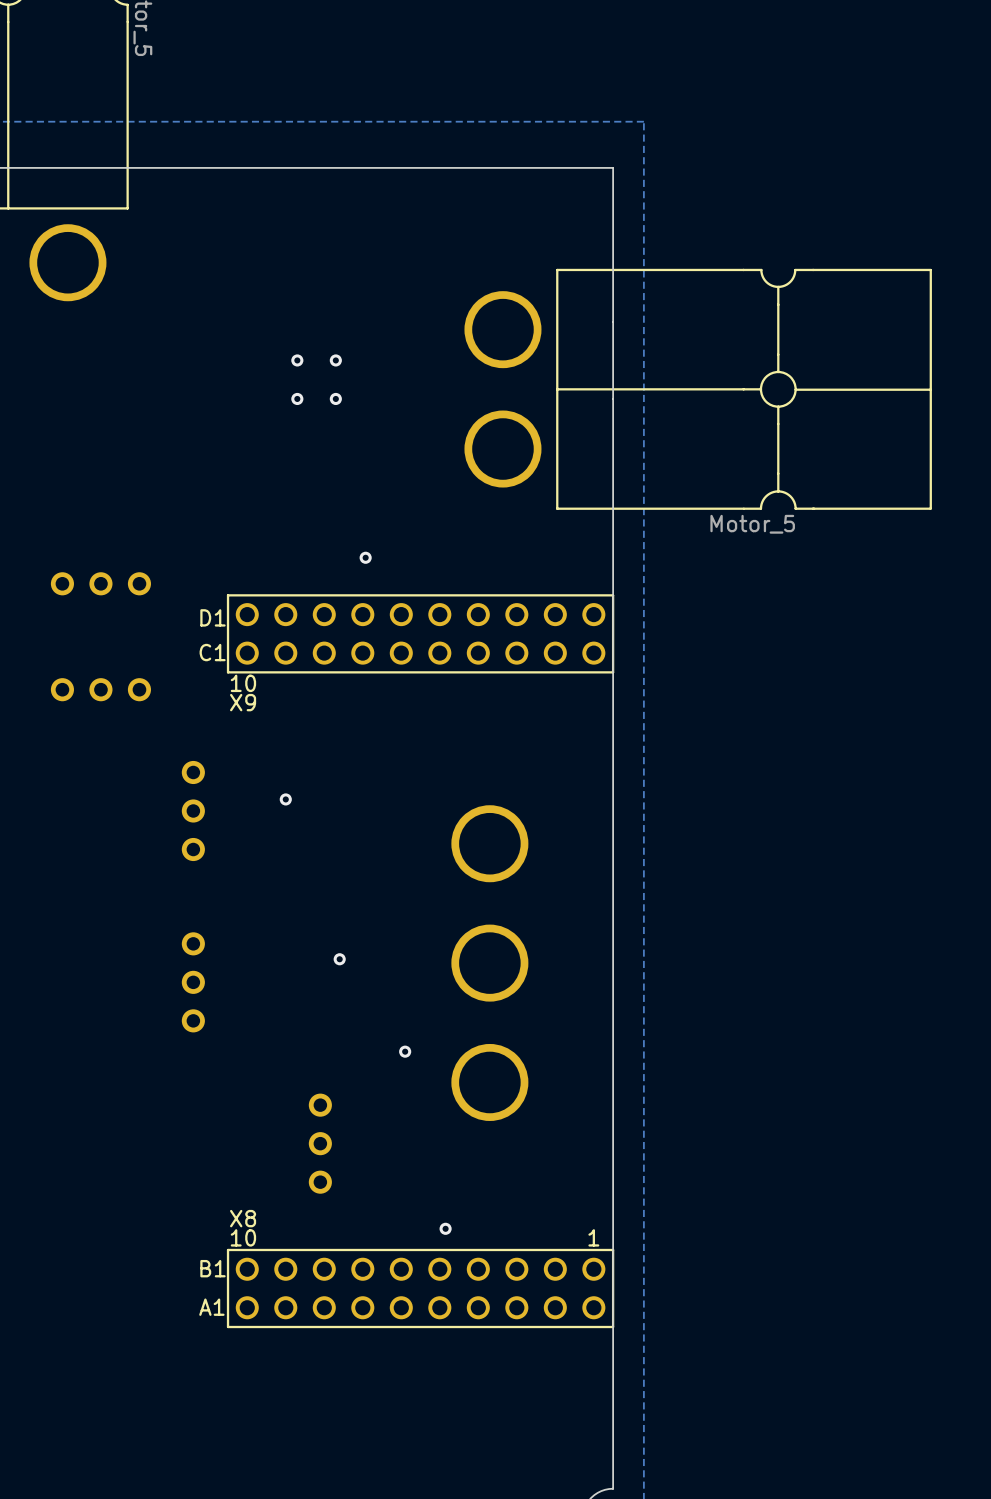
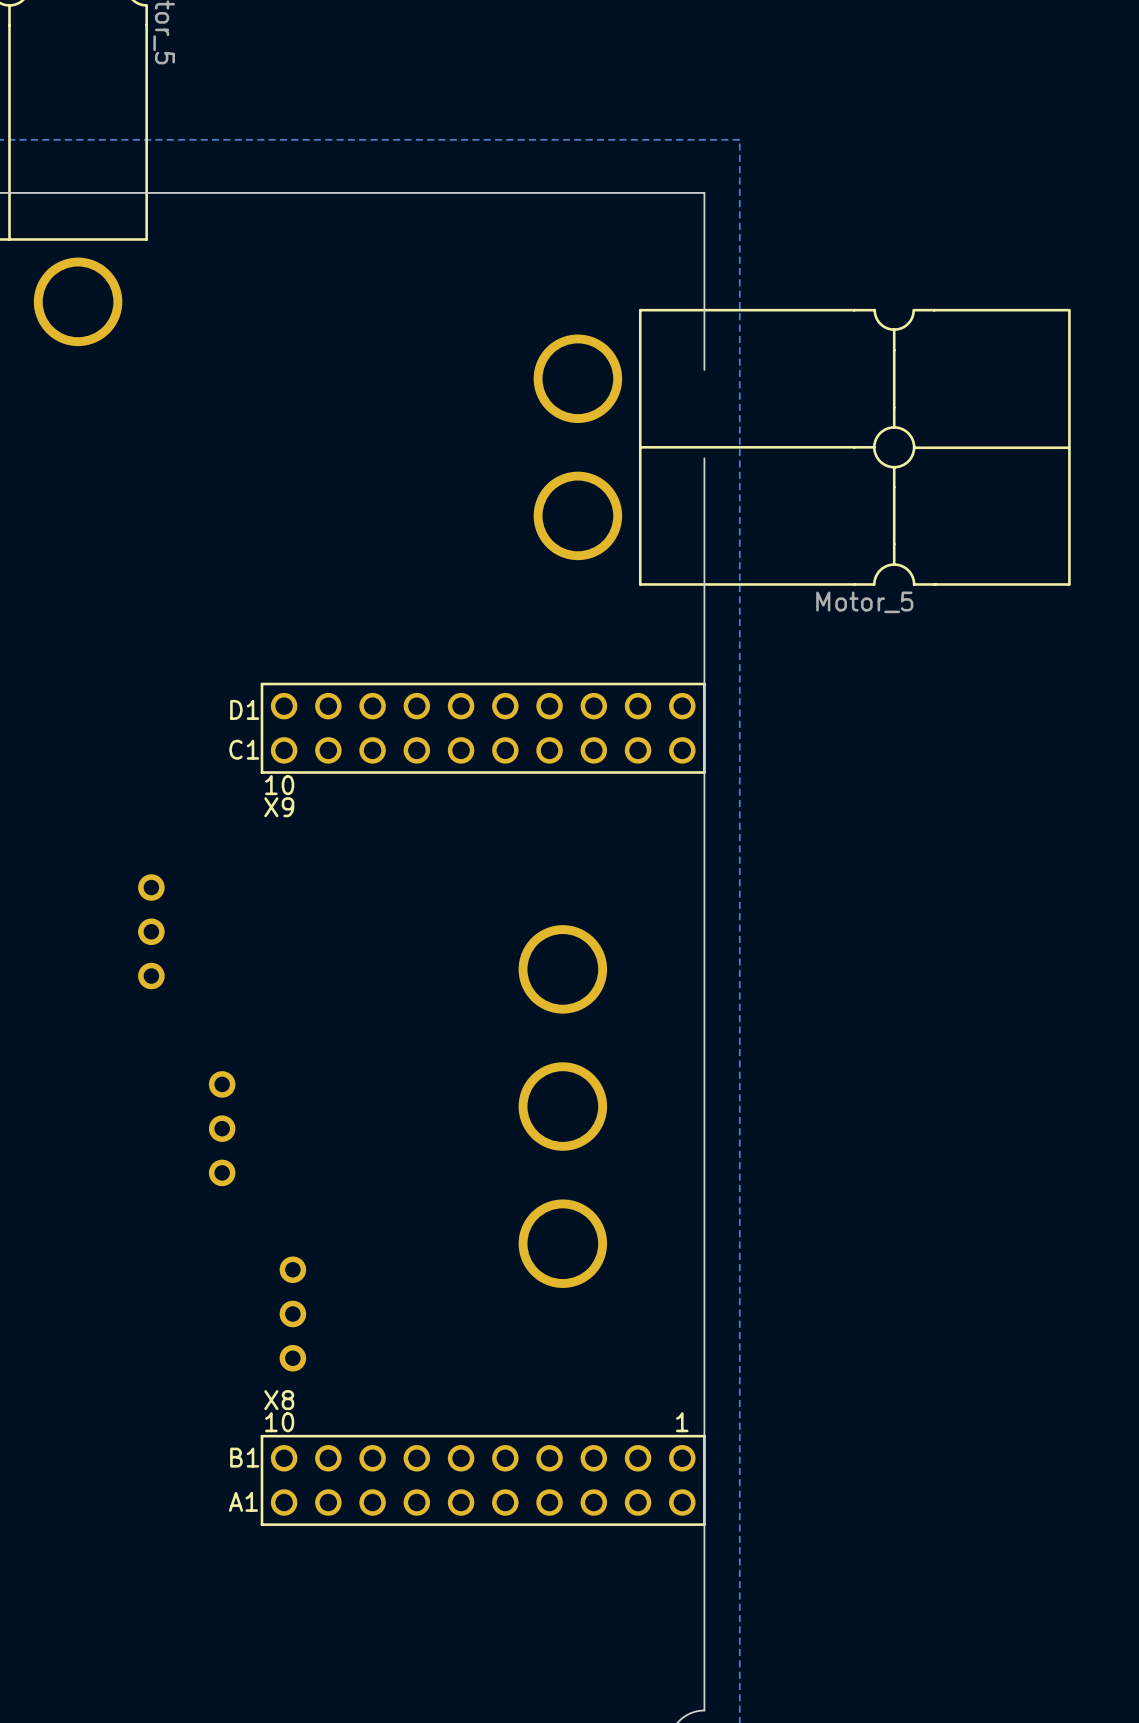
board edge: (613, 321) (613, 398) -> none
via: (297, 360) -> none
via: (335, 360) -> none
via: (297, 398) -> none
via: (335, 398) -> none
via: (365, 557) -> none
part: (100, 583) -> none
part: (100, 689) -> none
via: (285, 799) -> none
part position: (193, 811) -> (151, 931)
via: (339, 959) -> none
via: (405, 1051) -> none
part position: (320, 1143) -> (292, 1313)
via: (445, 1228) -> none

